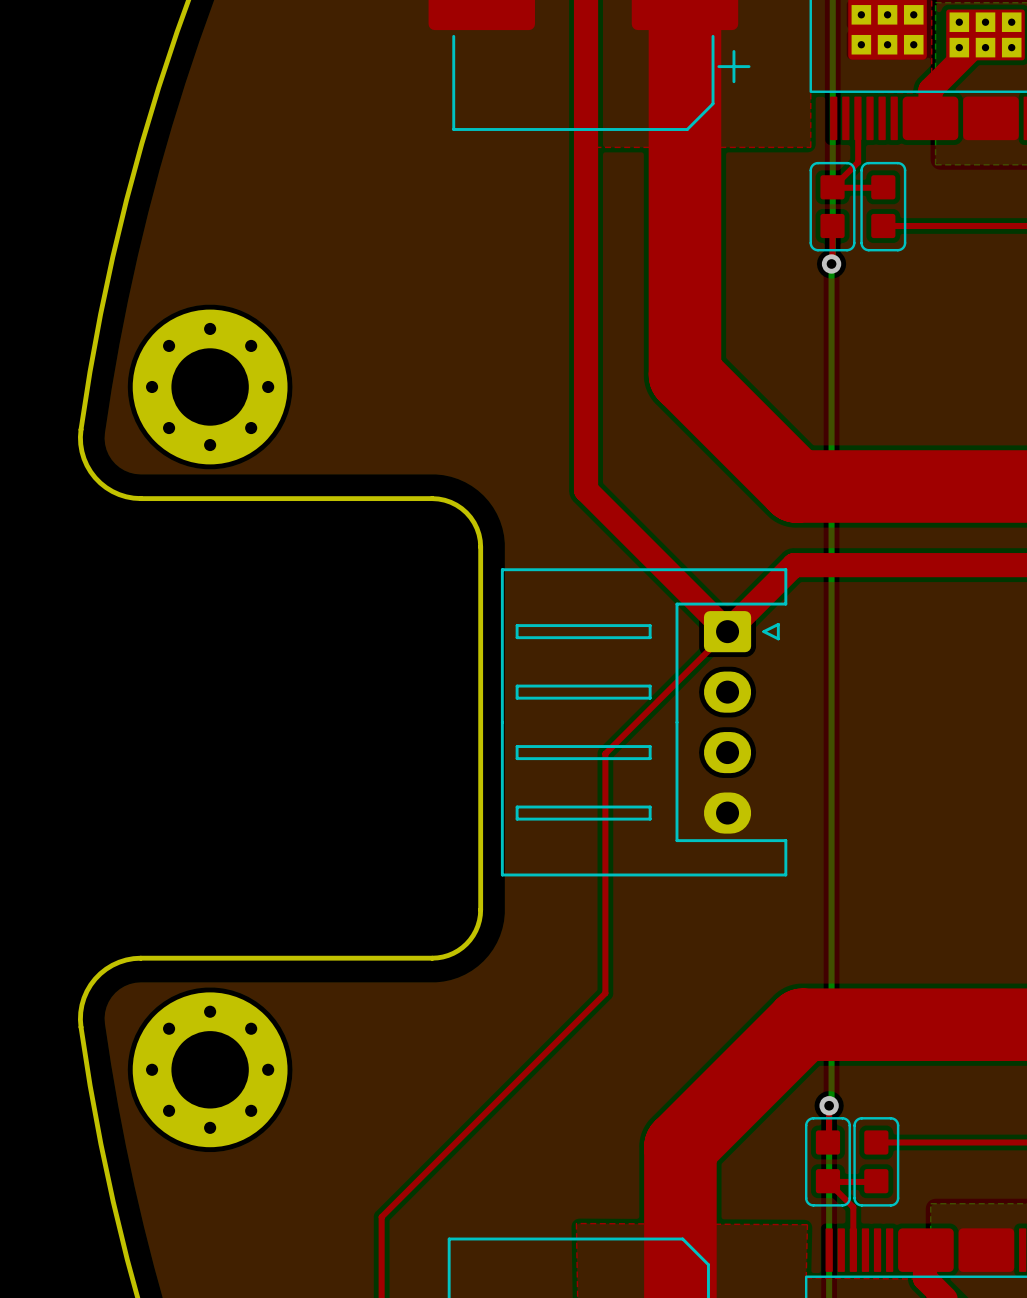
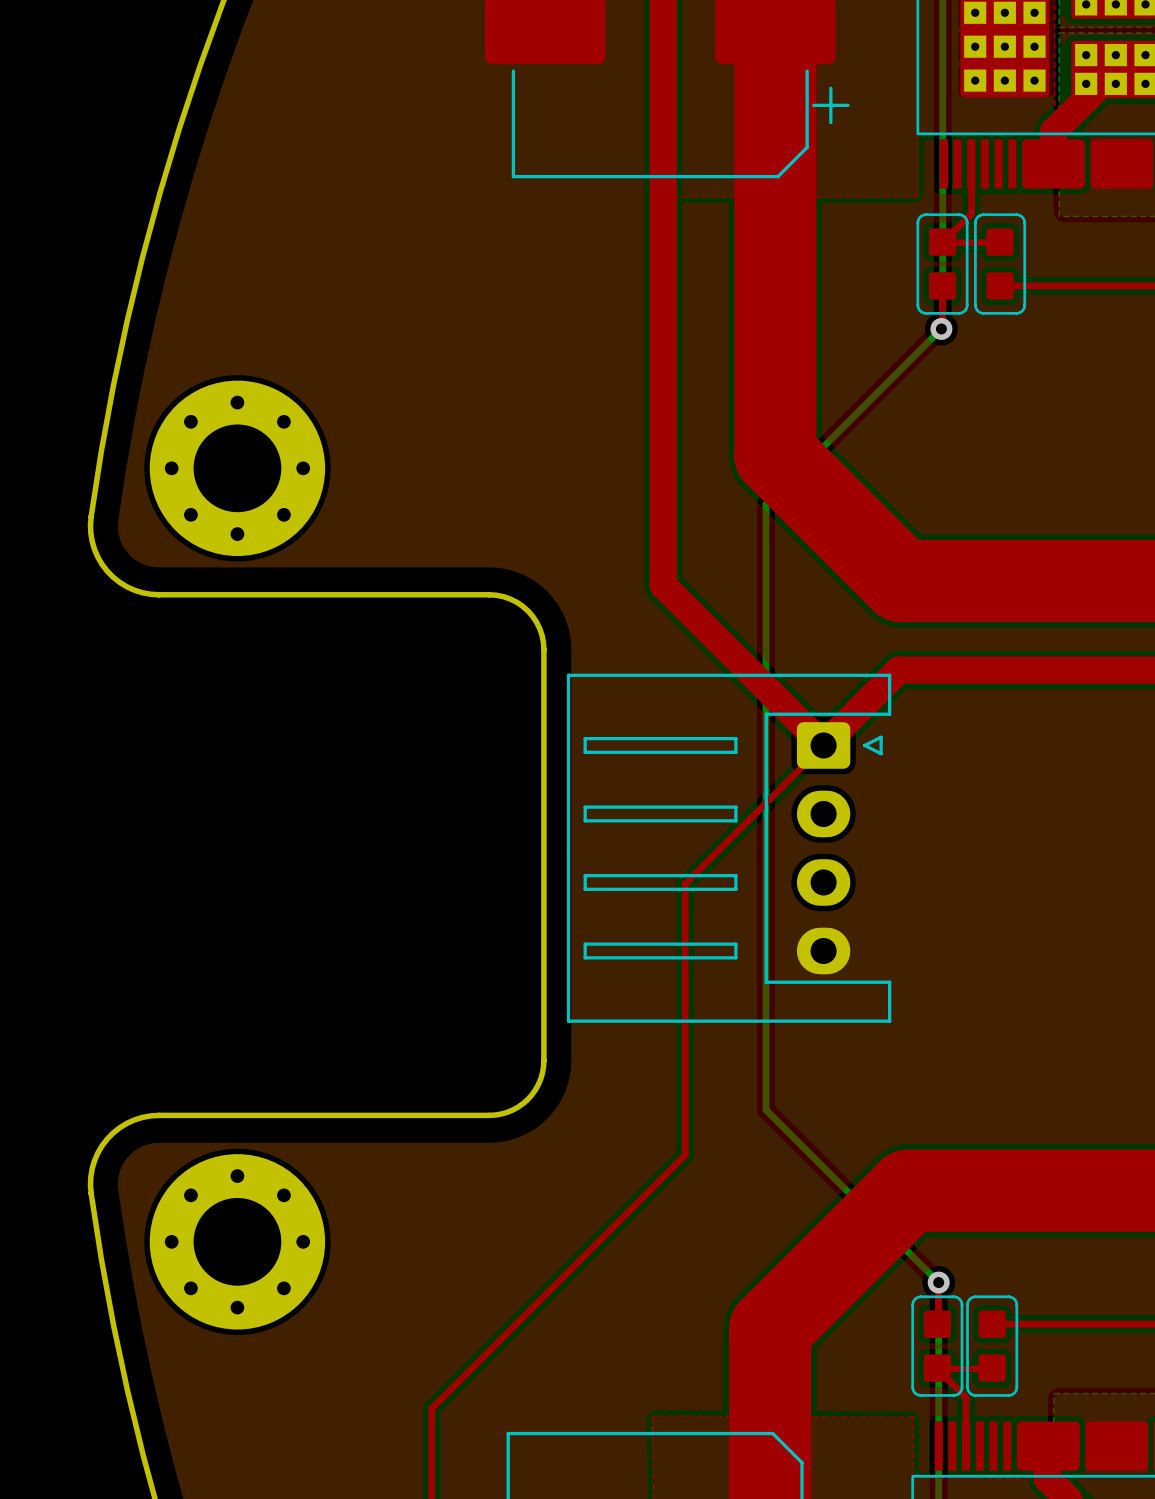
bottom track: (831, 263) (831, 1103) (829, 1105) -> (941, 328) (766, 504) (766, 1109) (938, 1282)

